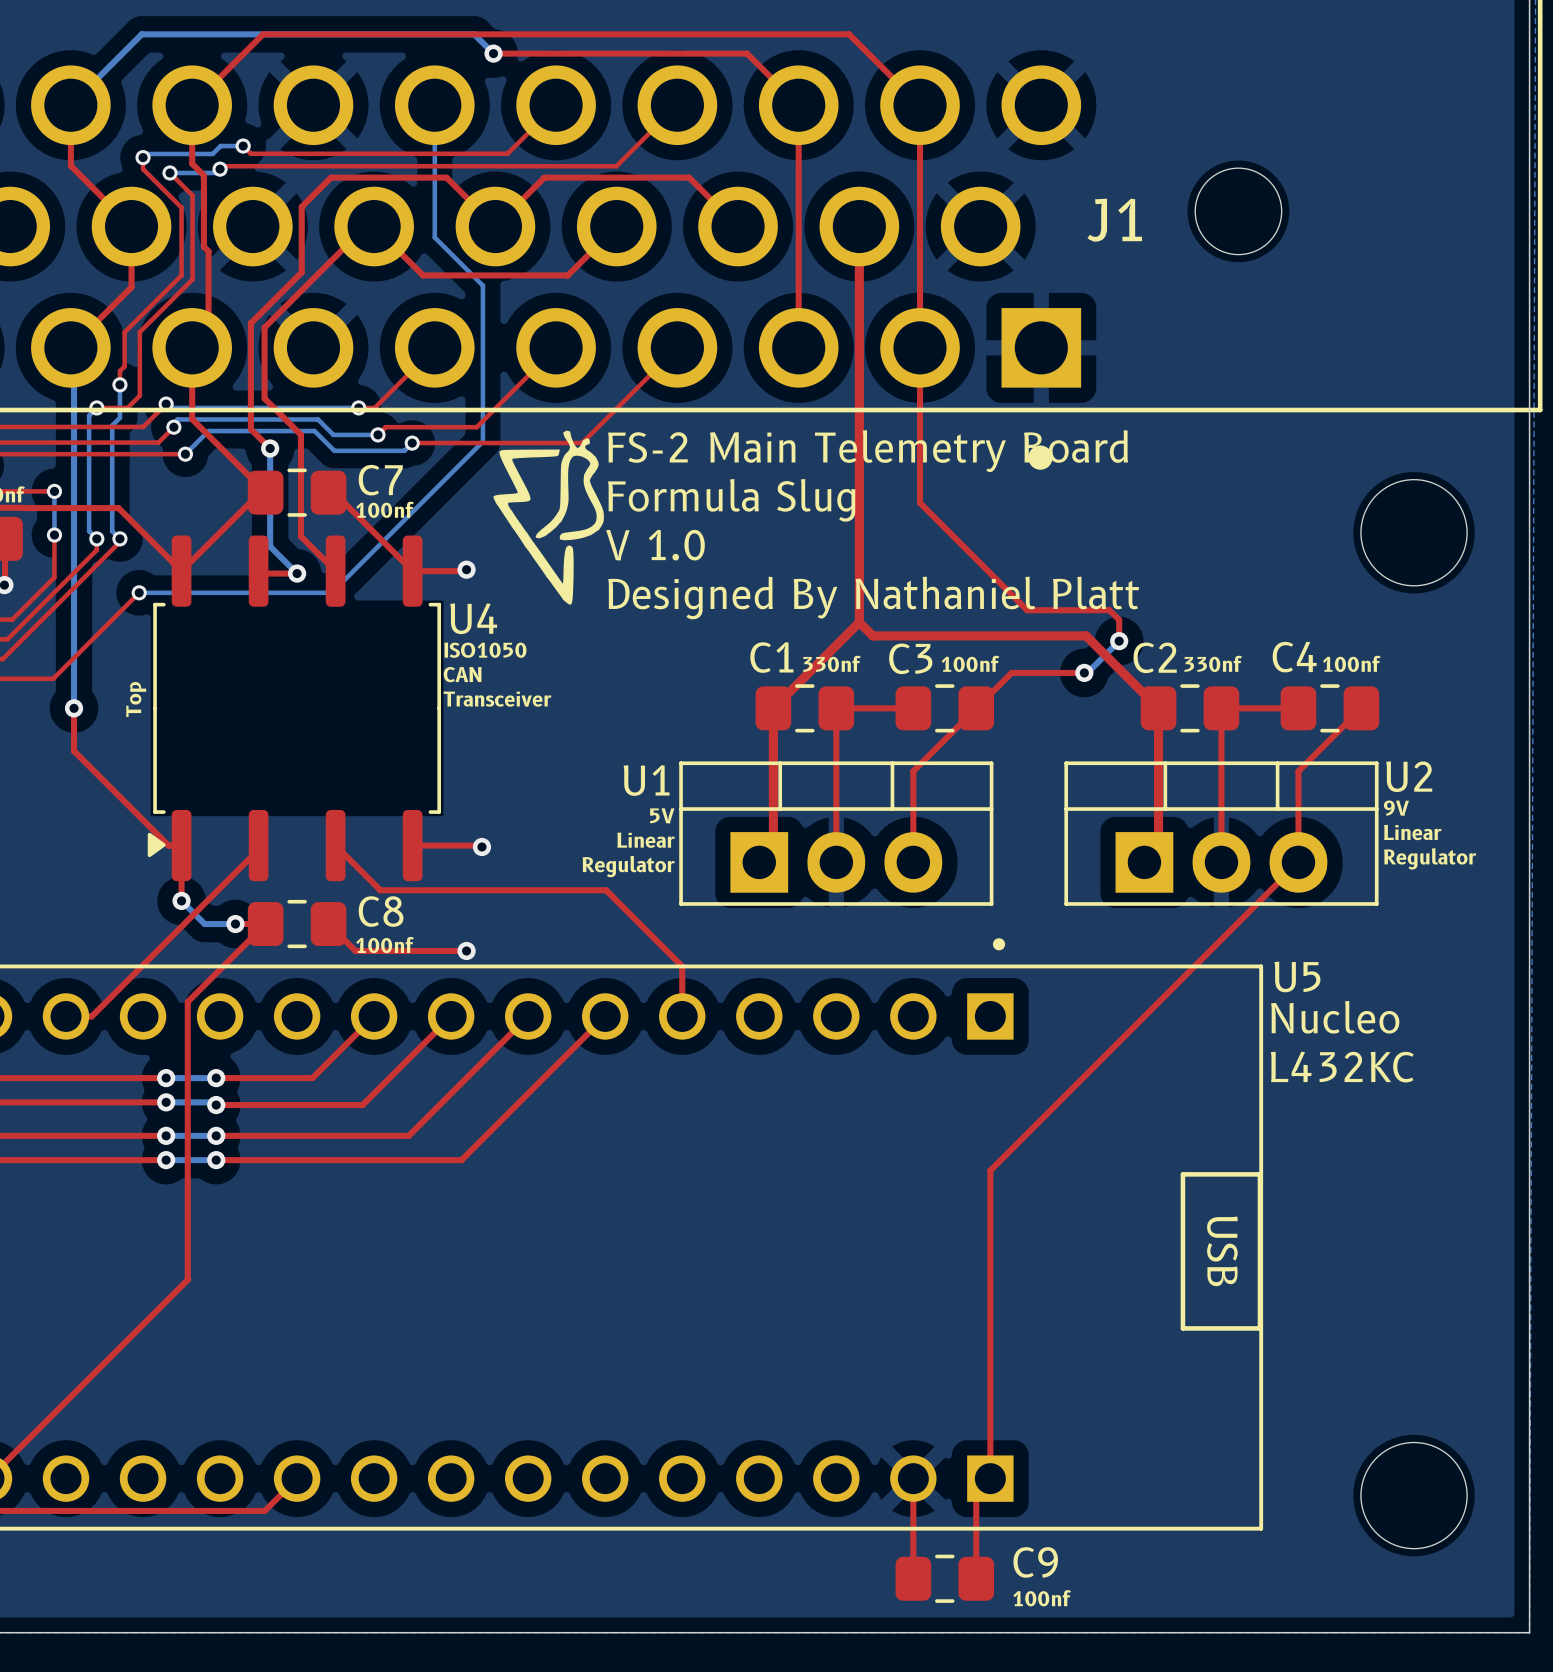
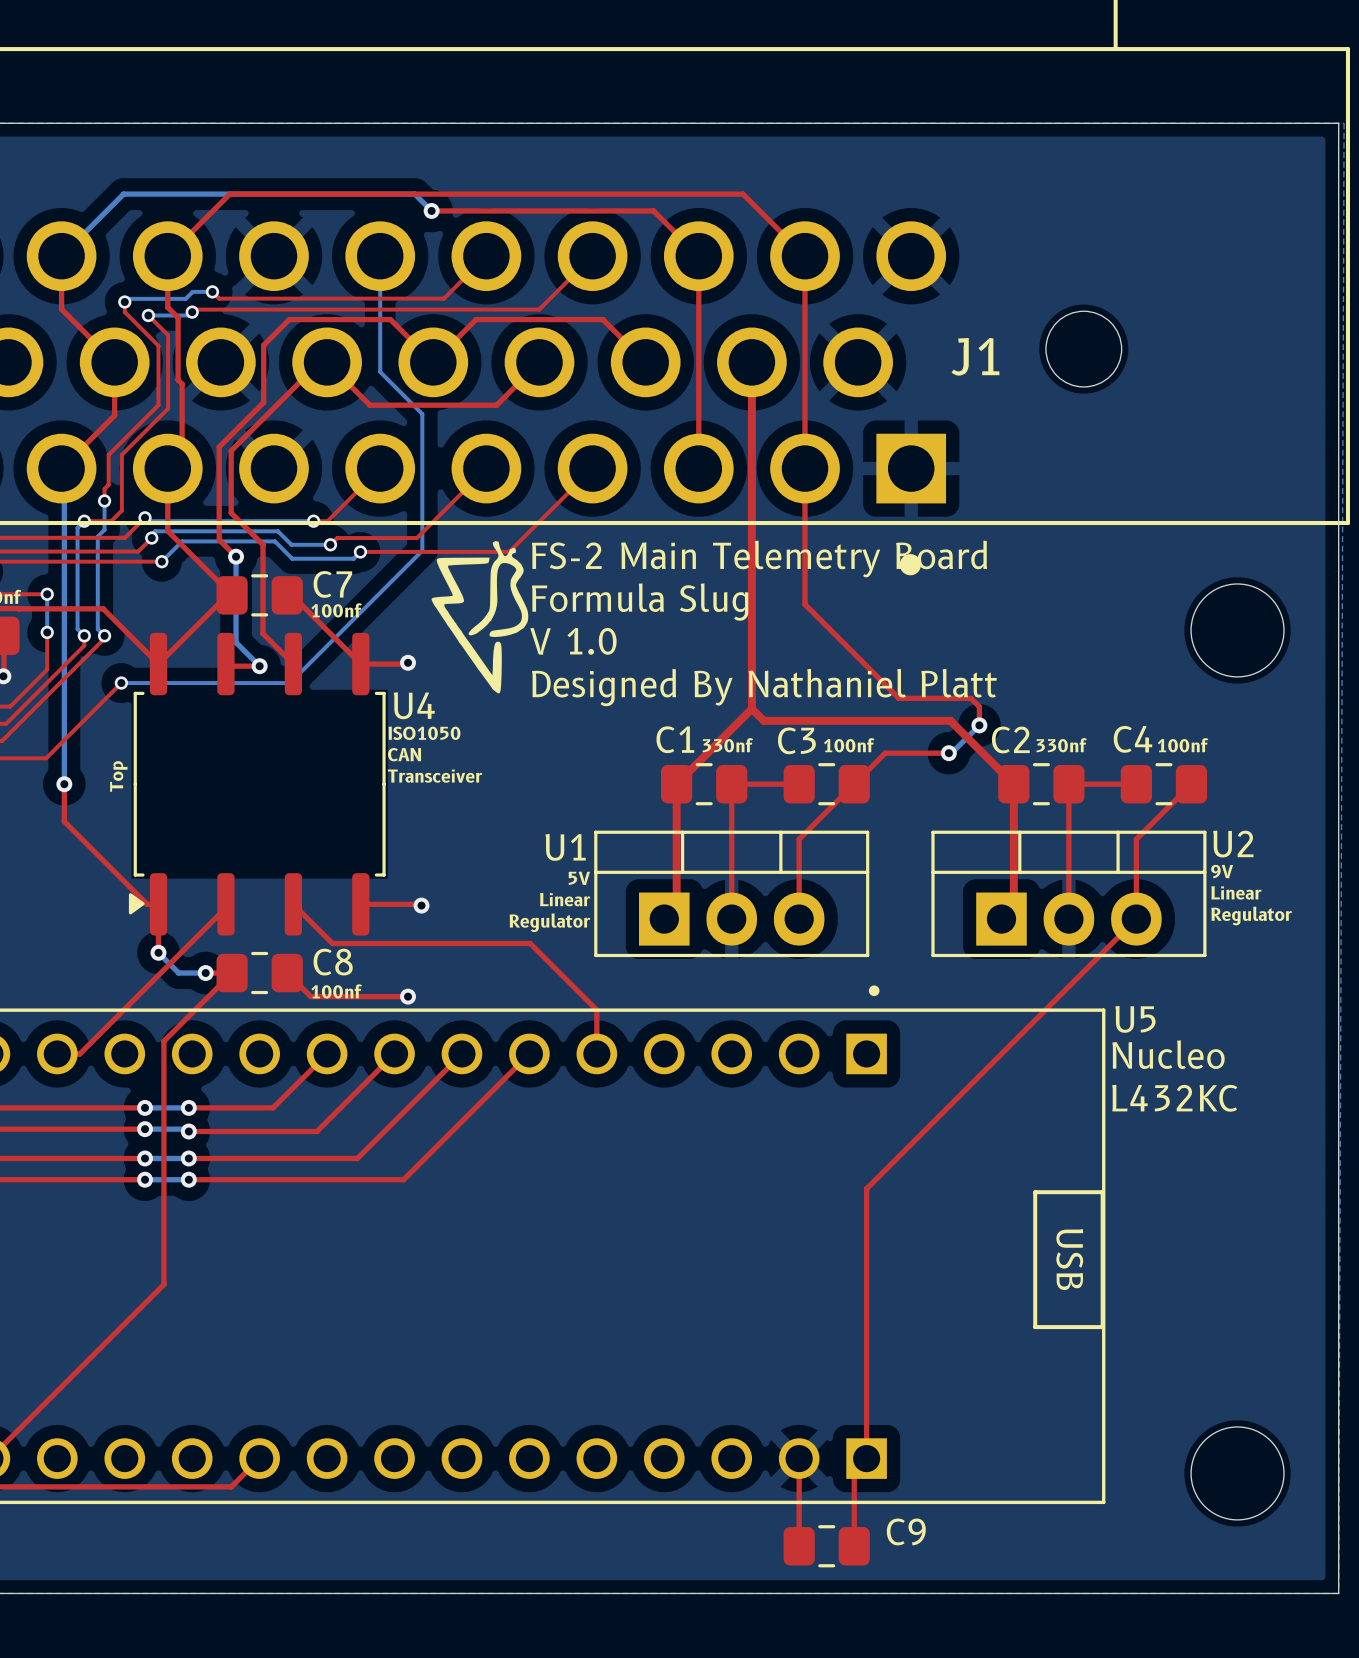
text: 100nf (1042, 1598) -> none

